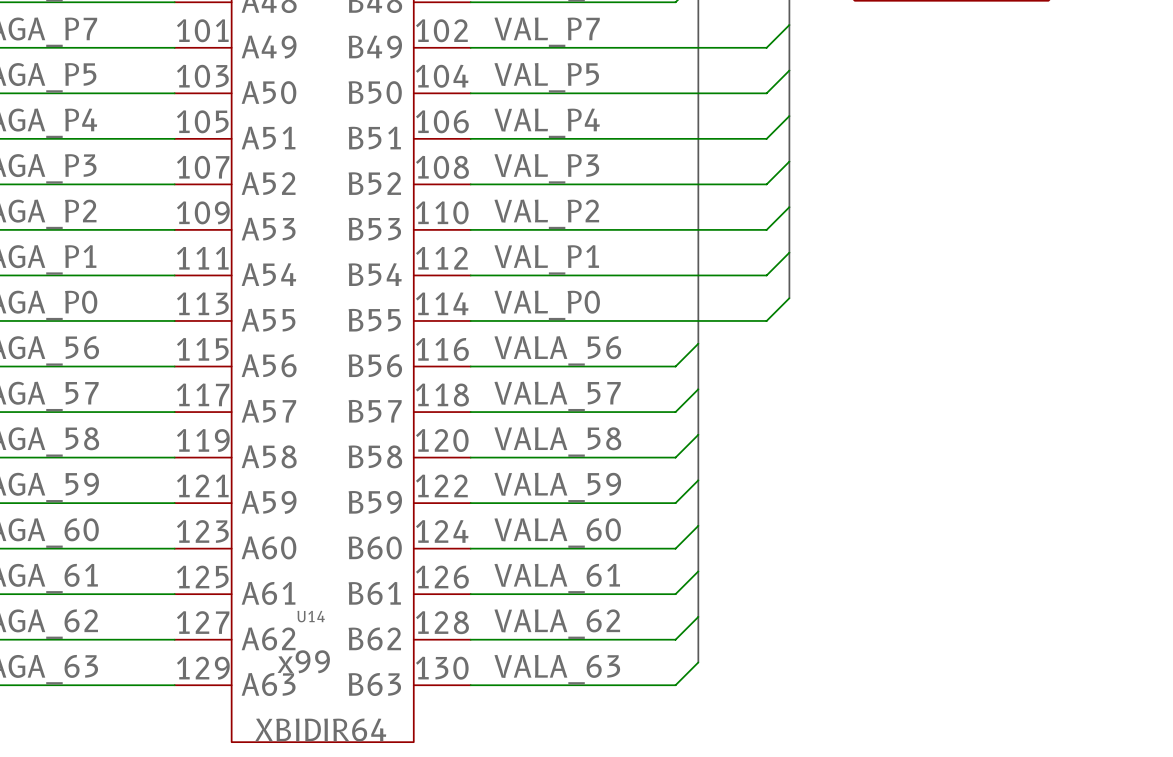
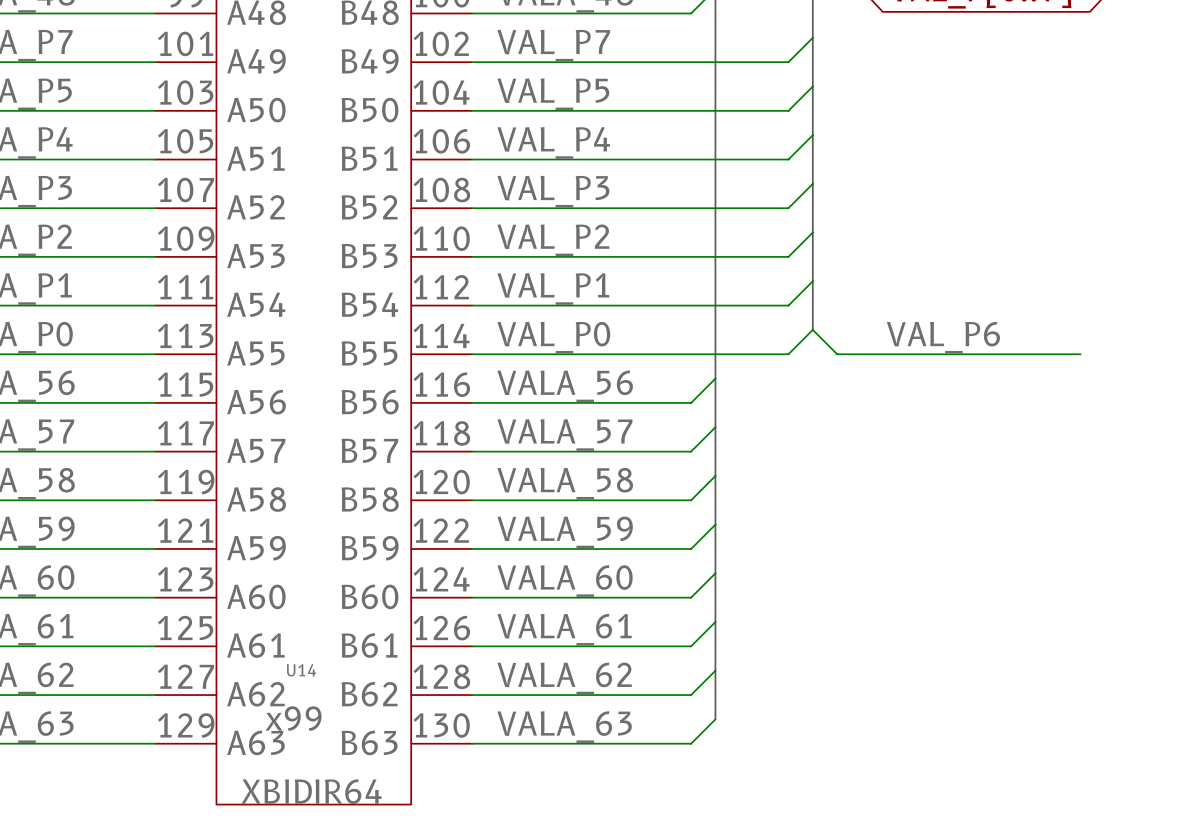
wire: none -> (812, 329) (837, 354) (1080, 354)
label: none -> VAL_P6 (943, 337)

